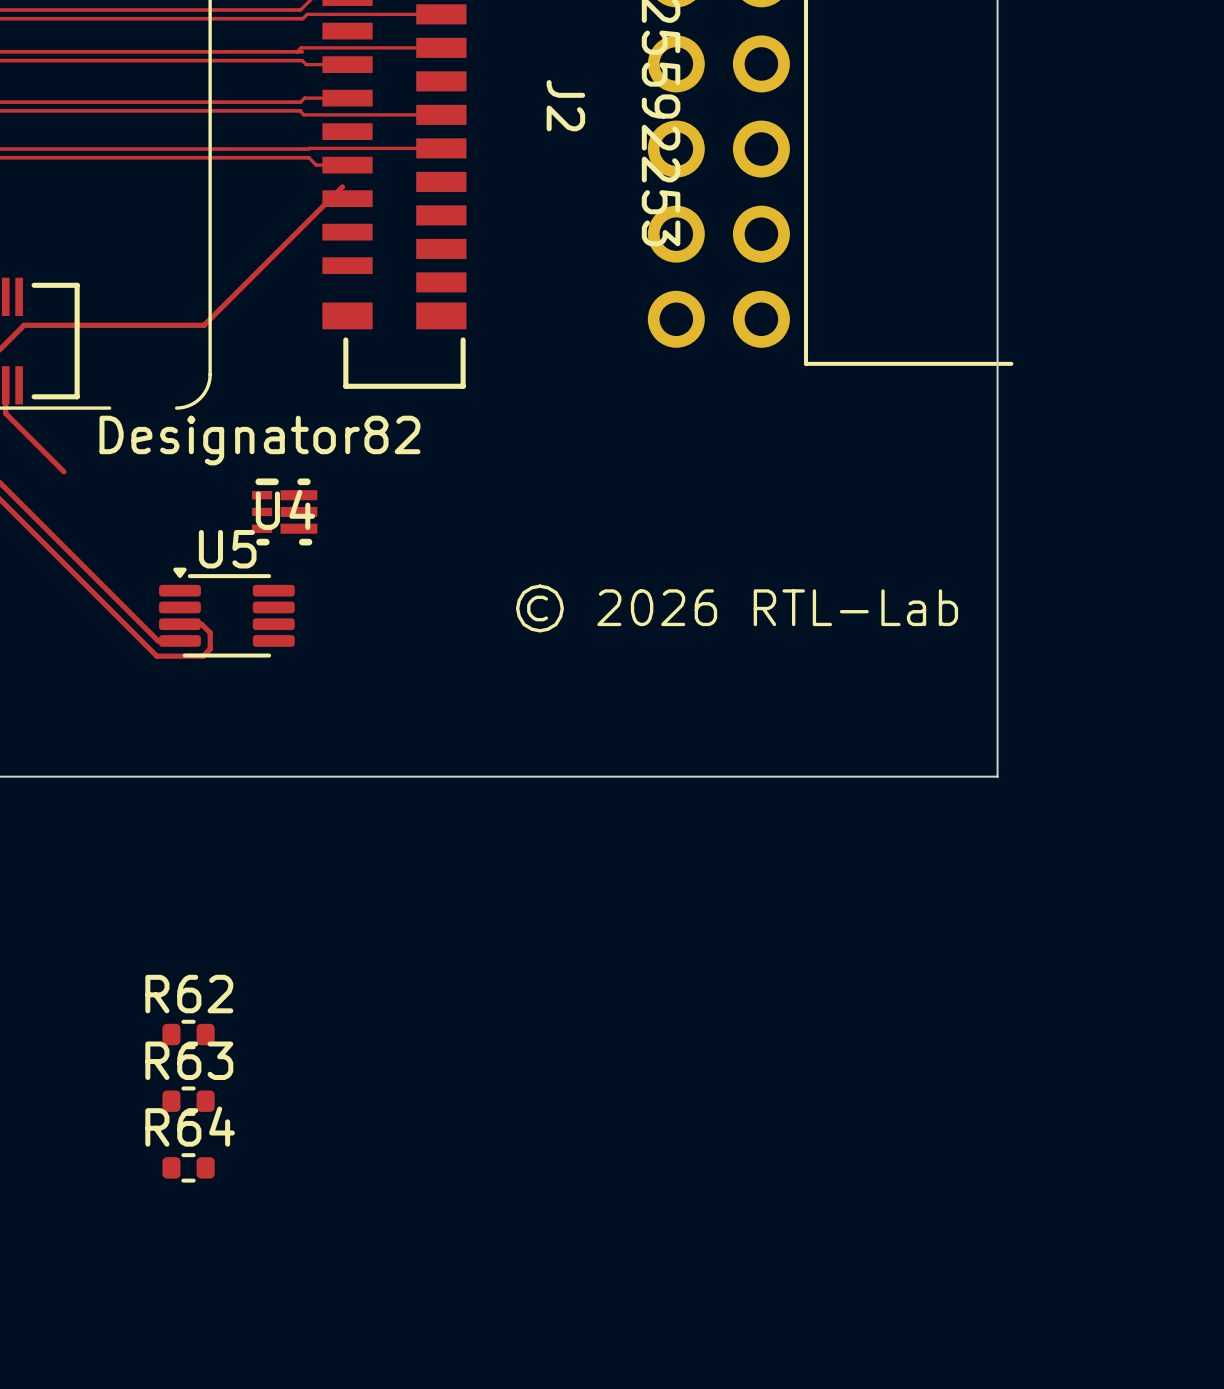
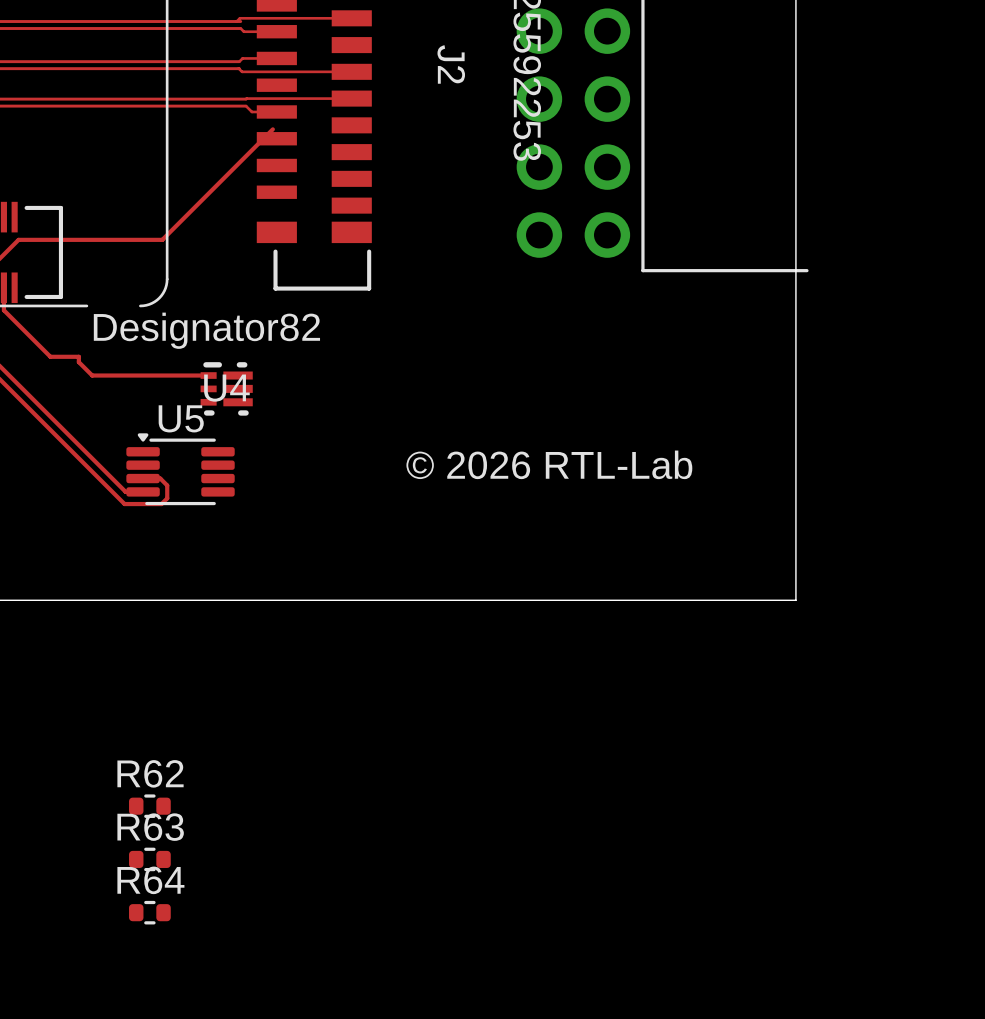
track: none -> (50, 356) (78, 356) (78, 362) (92, 375) (208, 375)

